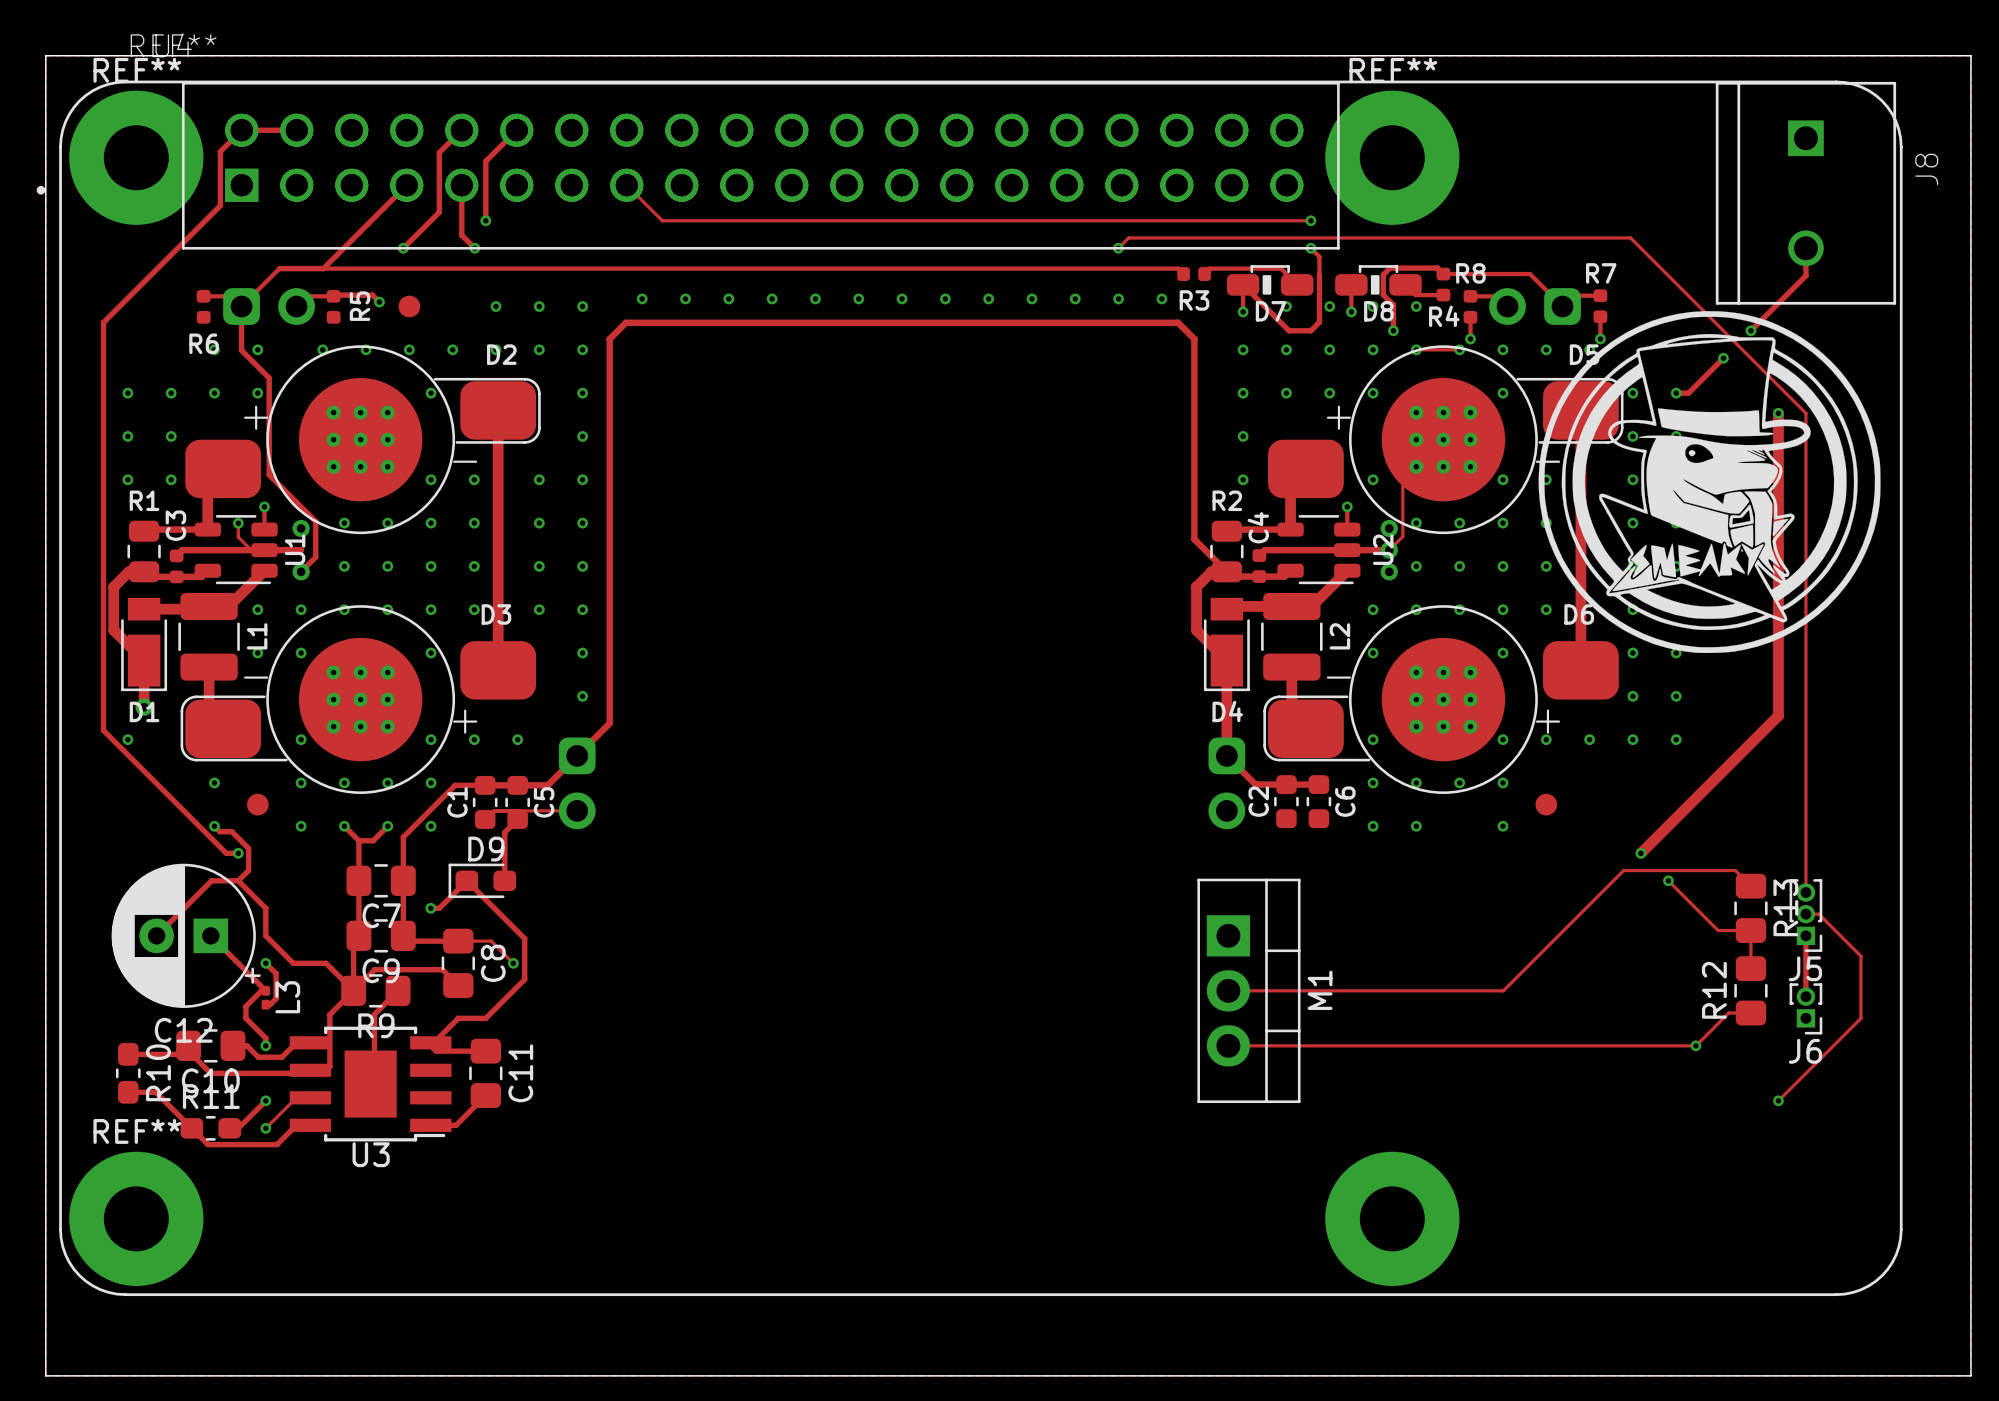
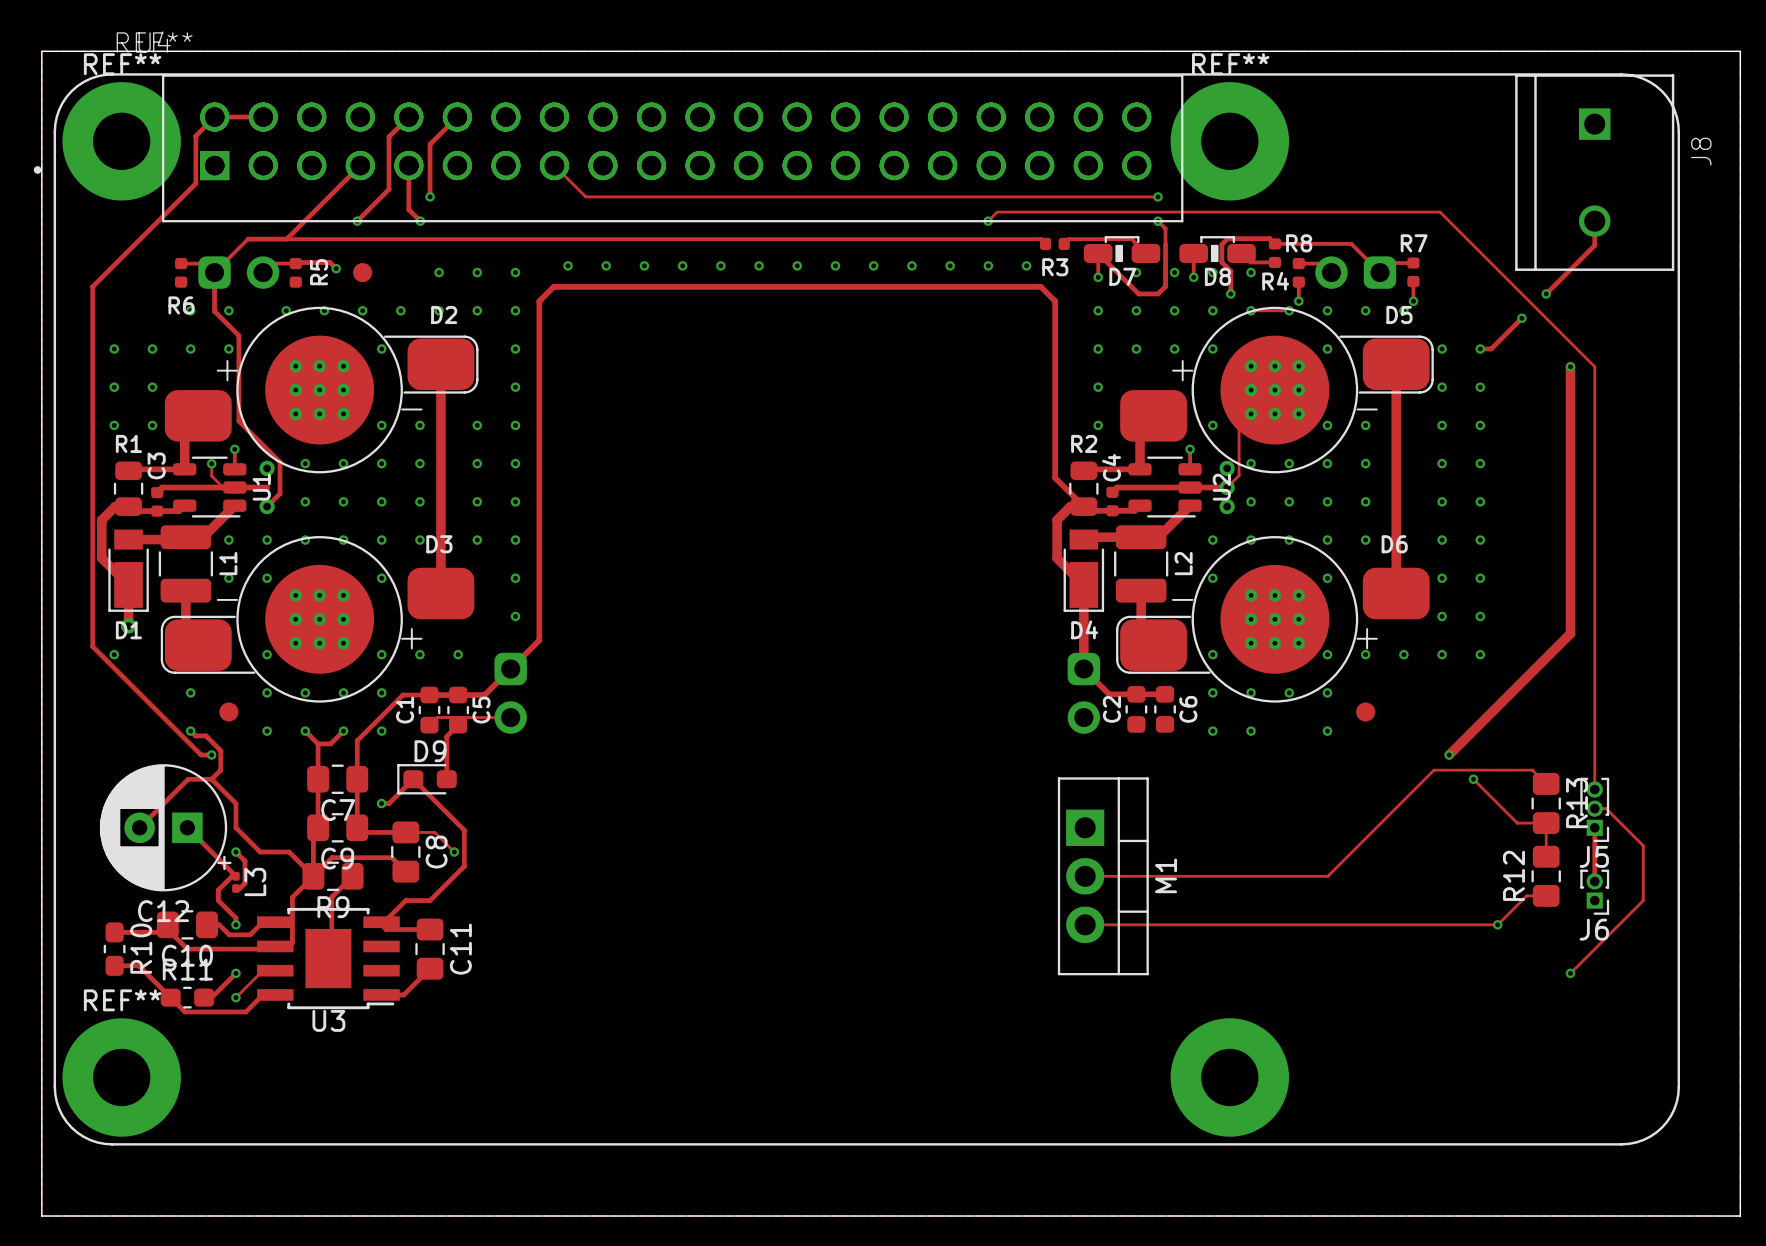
drawing: [1538, 311, 1881, 654] -> none

